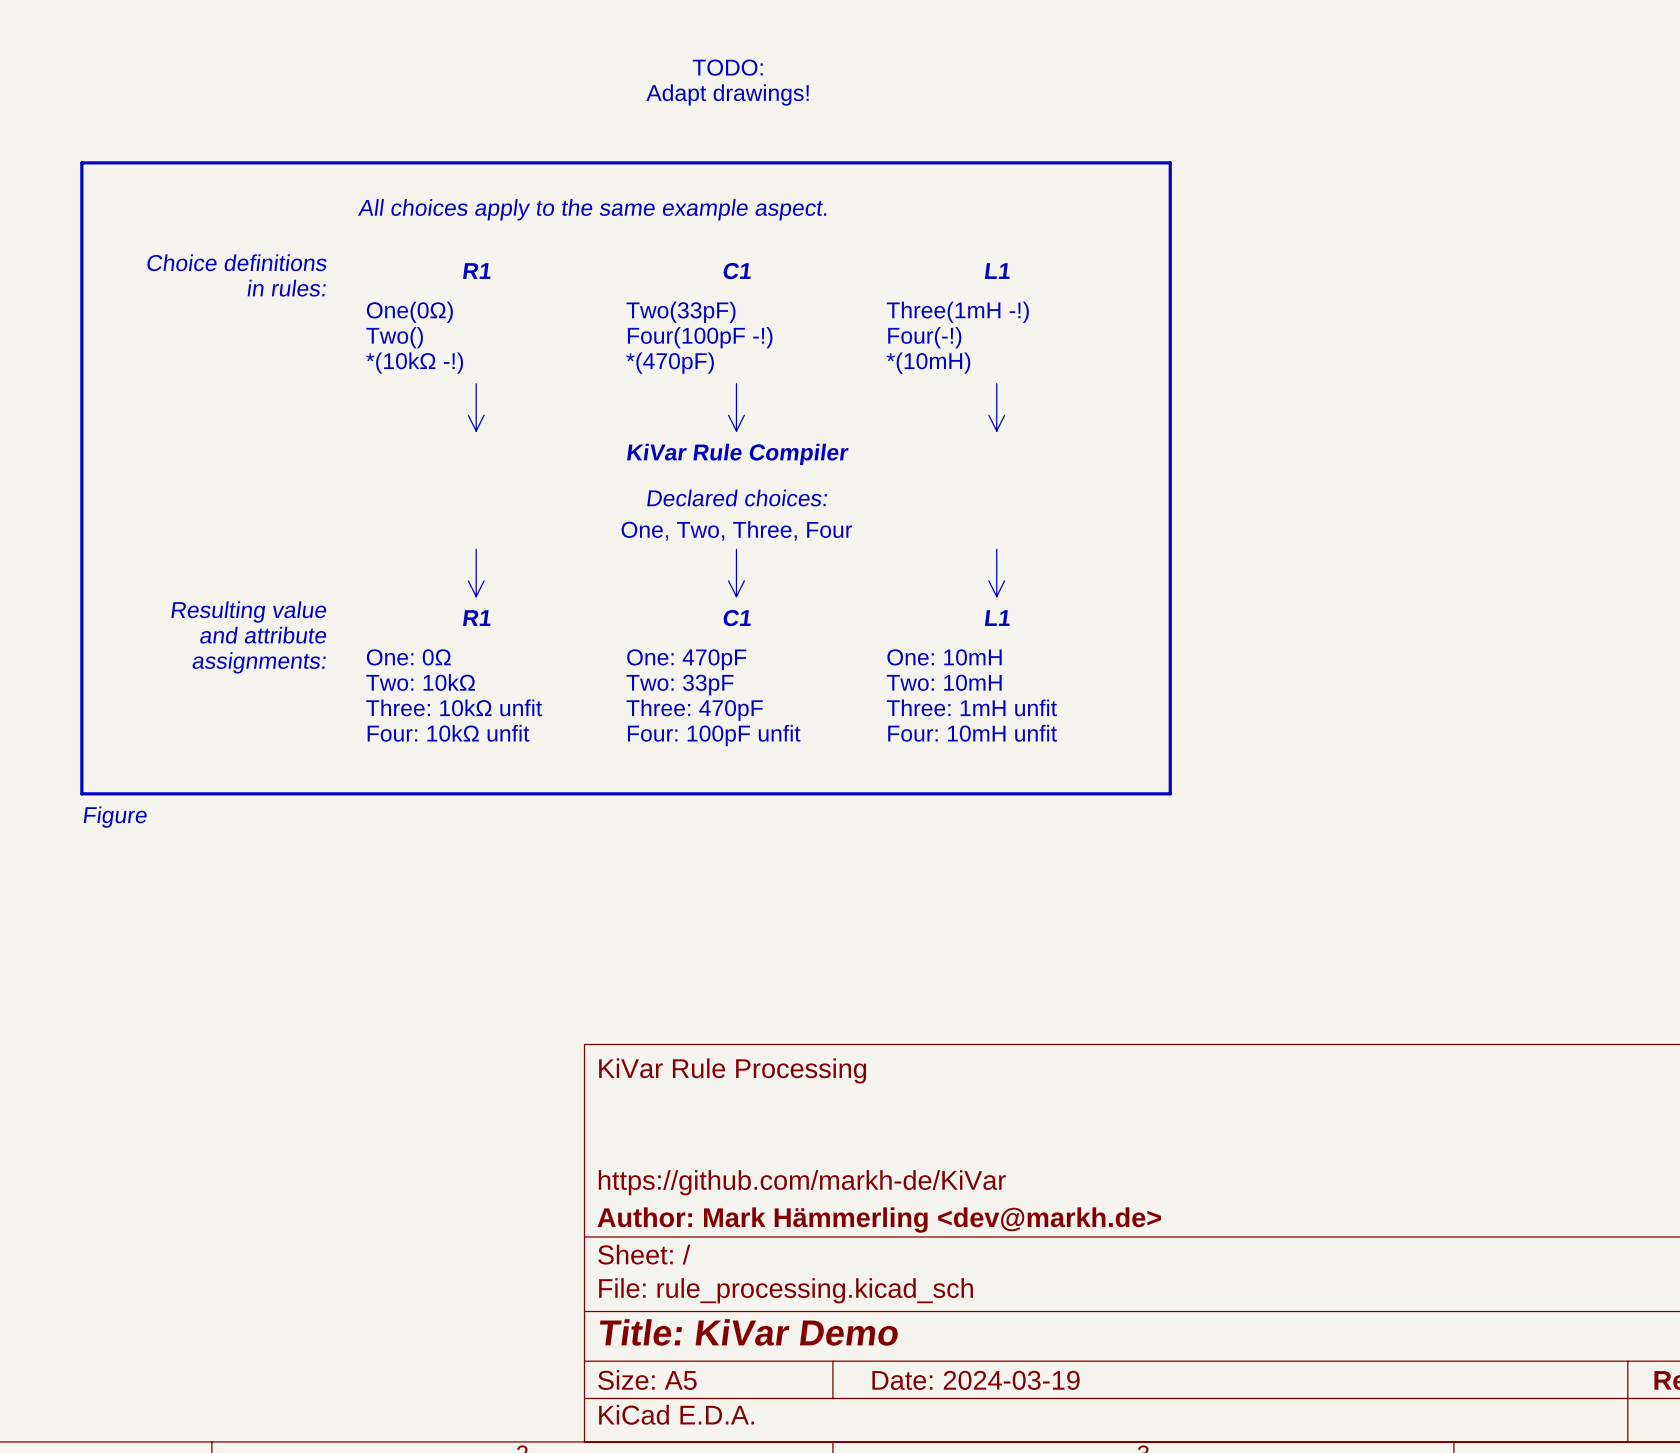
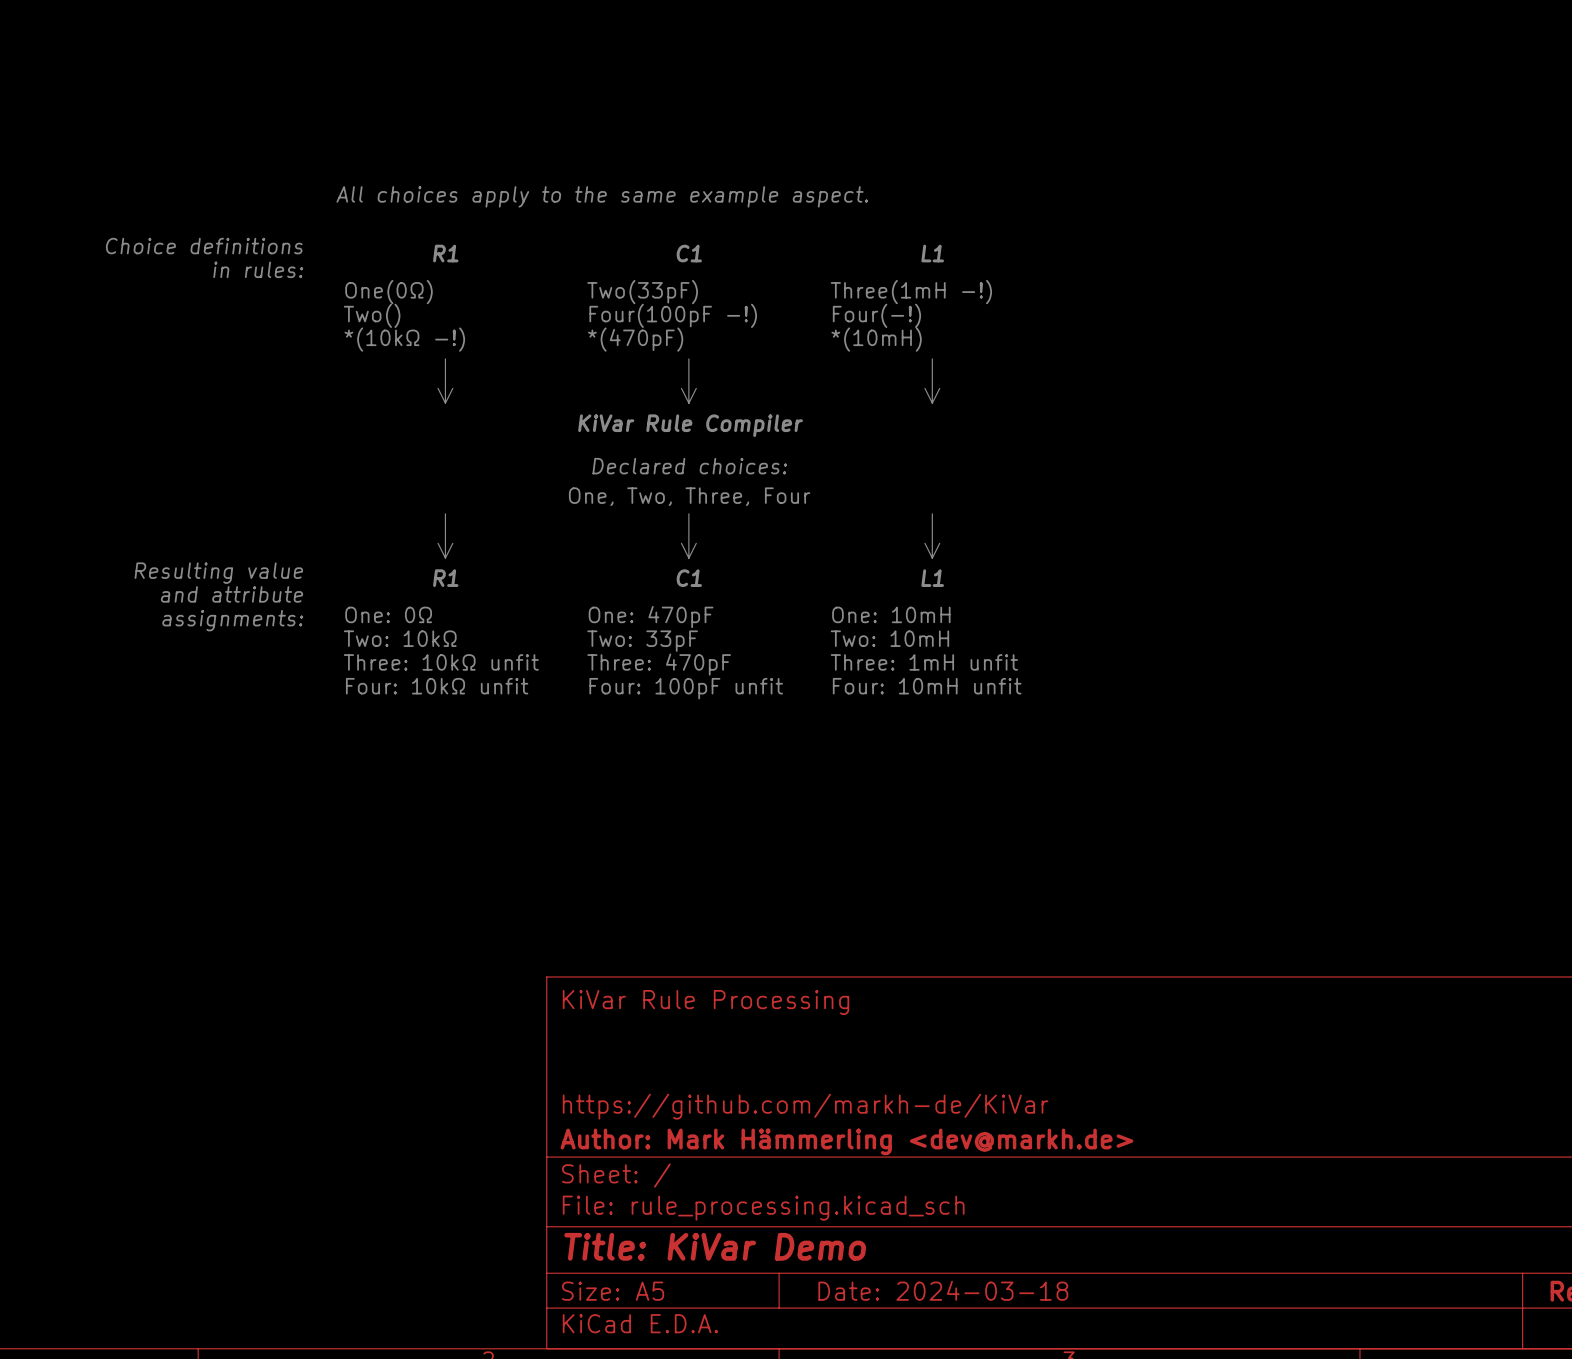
text: TODO: (727, 67) -> none
text: Adapt drawings! (727, 94) -> none
line: (81, 162) (1170, 162) (1170, 793) (81, 793) (81, 162) -> none
text: Figure (115, 817) -> none
title block: Date: 2024-03-19 (976, 1380) -> Date: 2024-03-18 (943, 1290)

